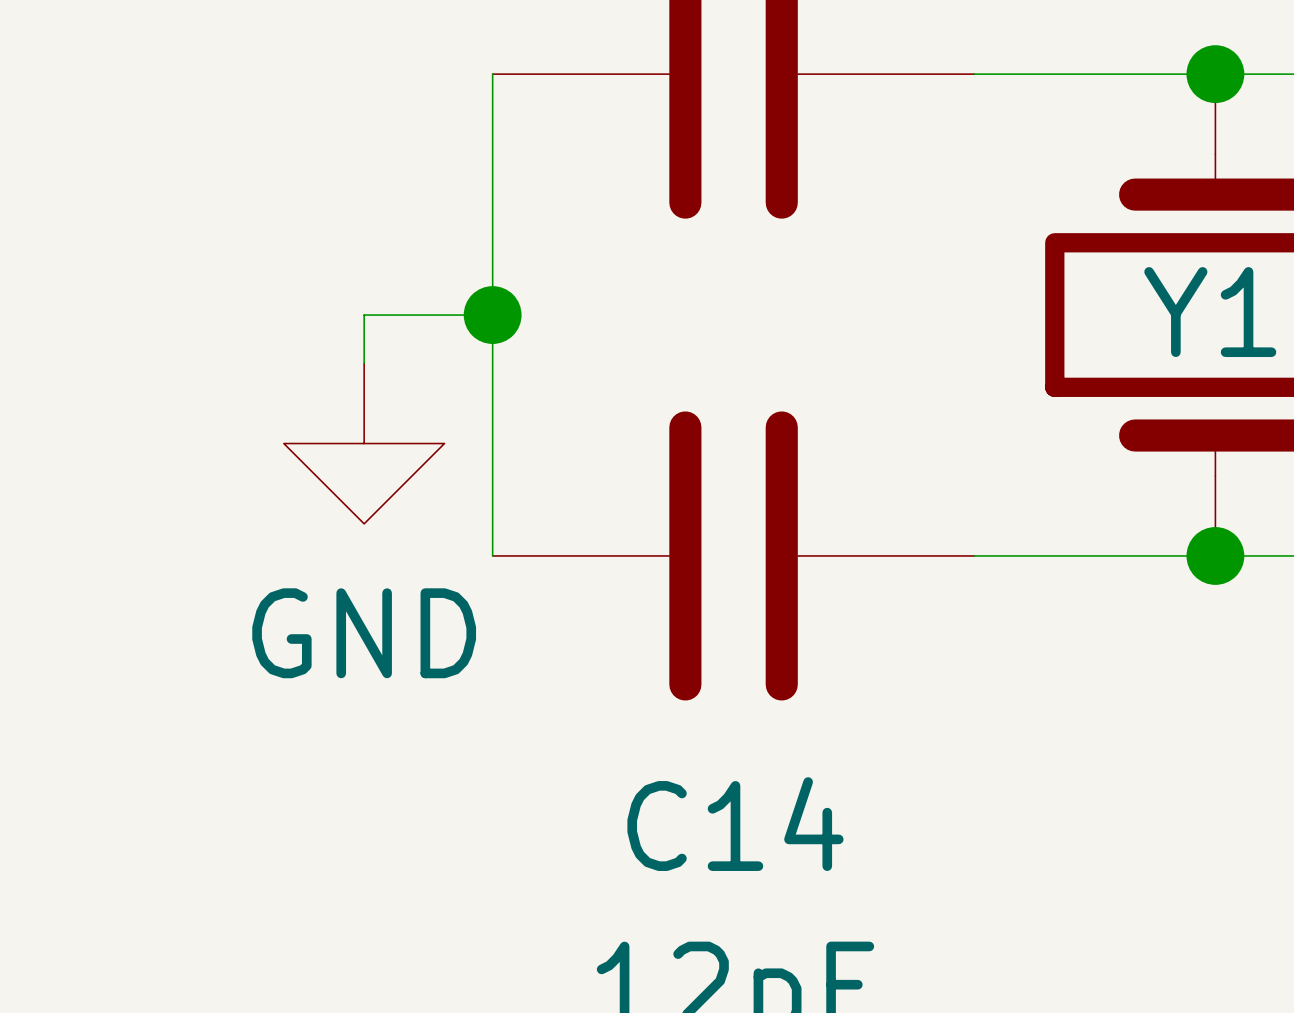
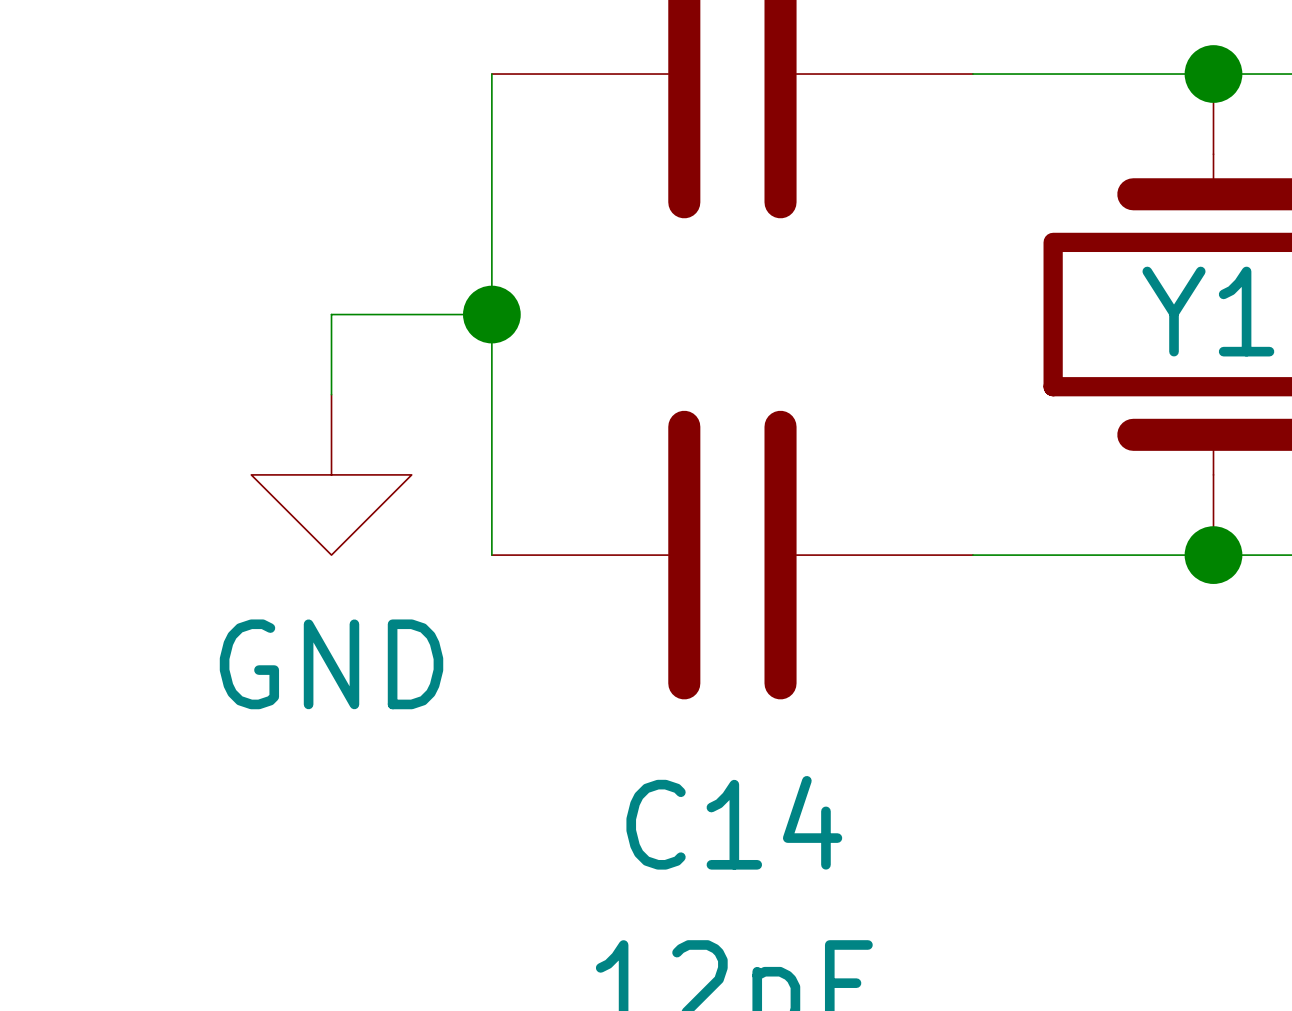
wire: (364, 315) (364, 363) -> (363, 314) (331, 314) (331, 394)
power symbol position: GND (364, 443) -> GND (331, 474)

